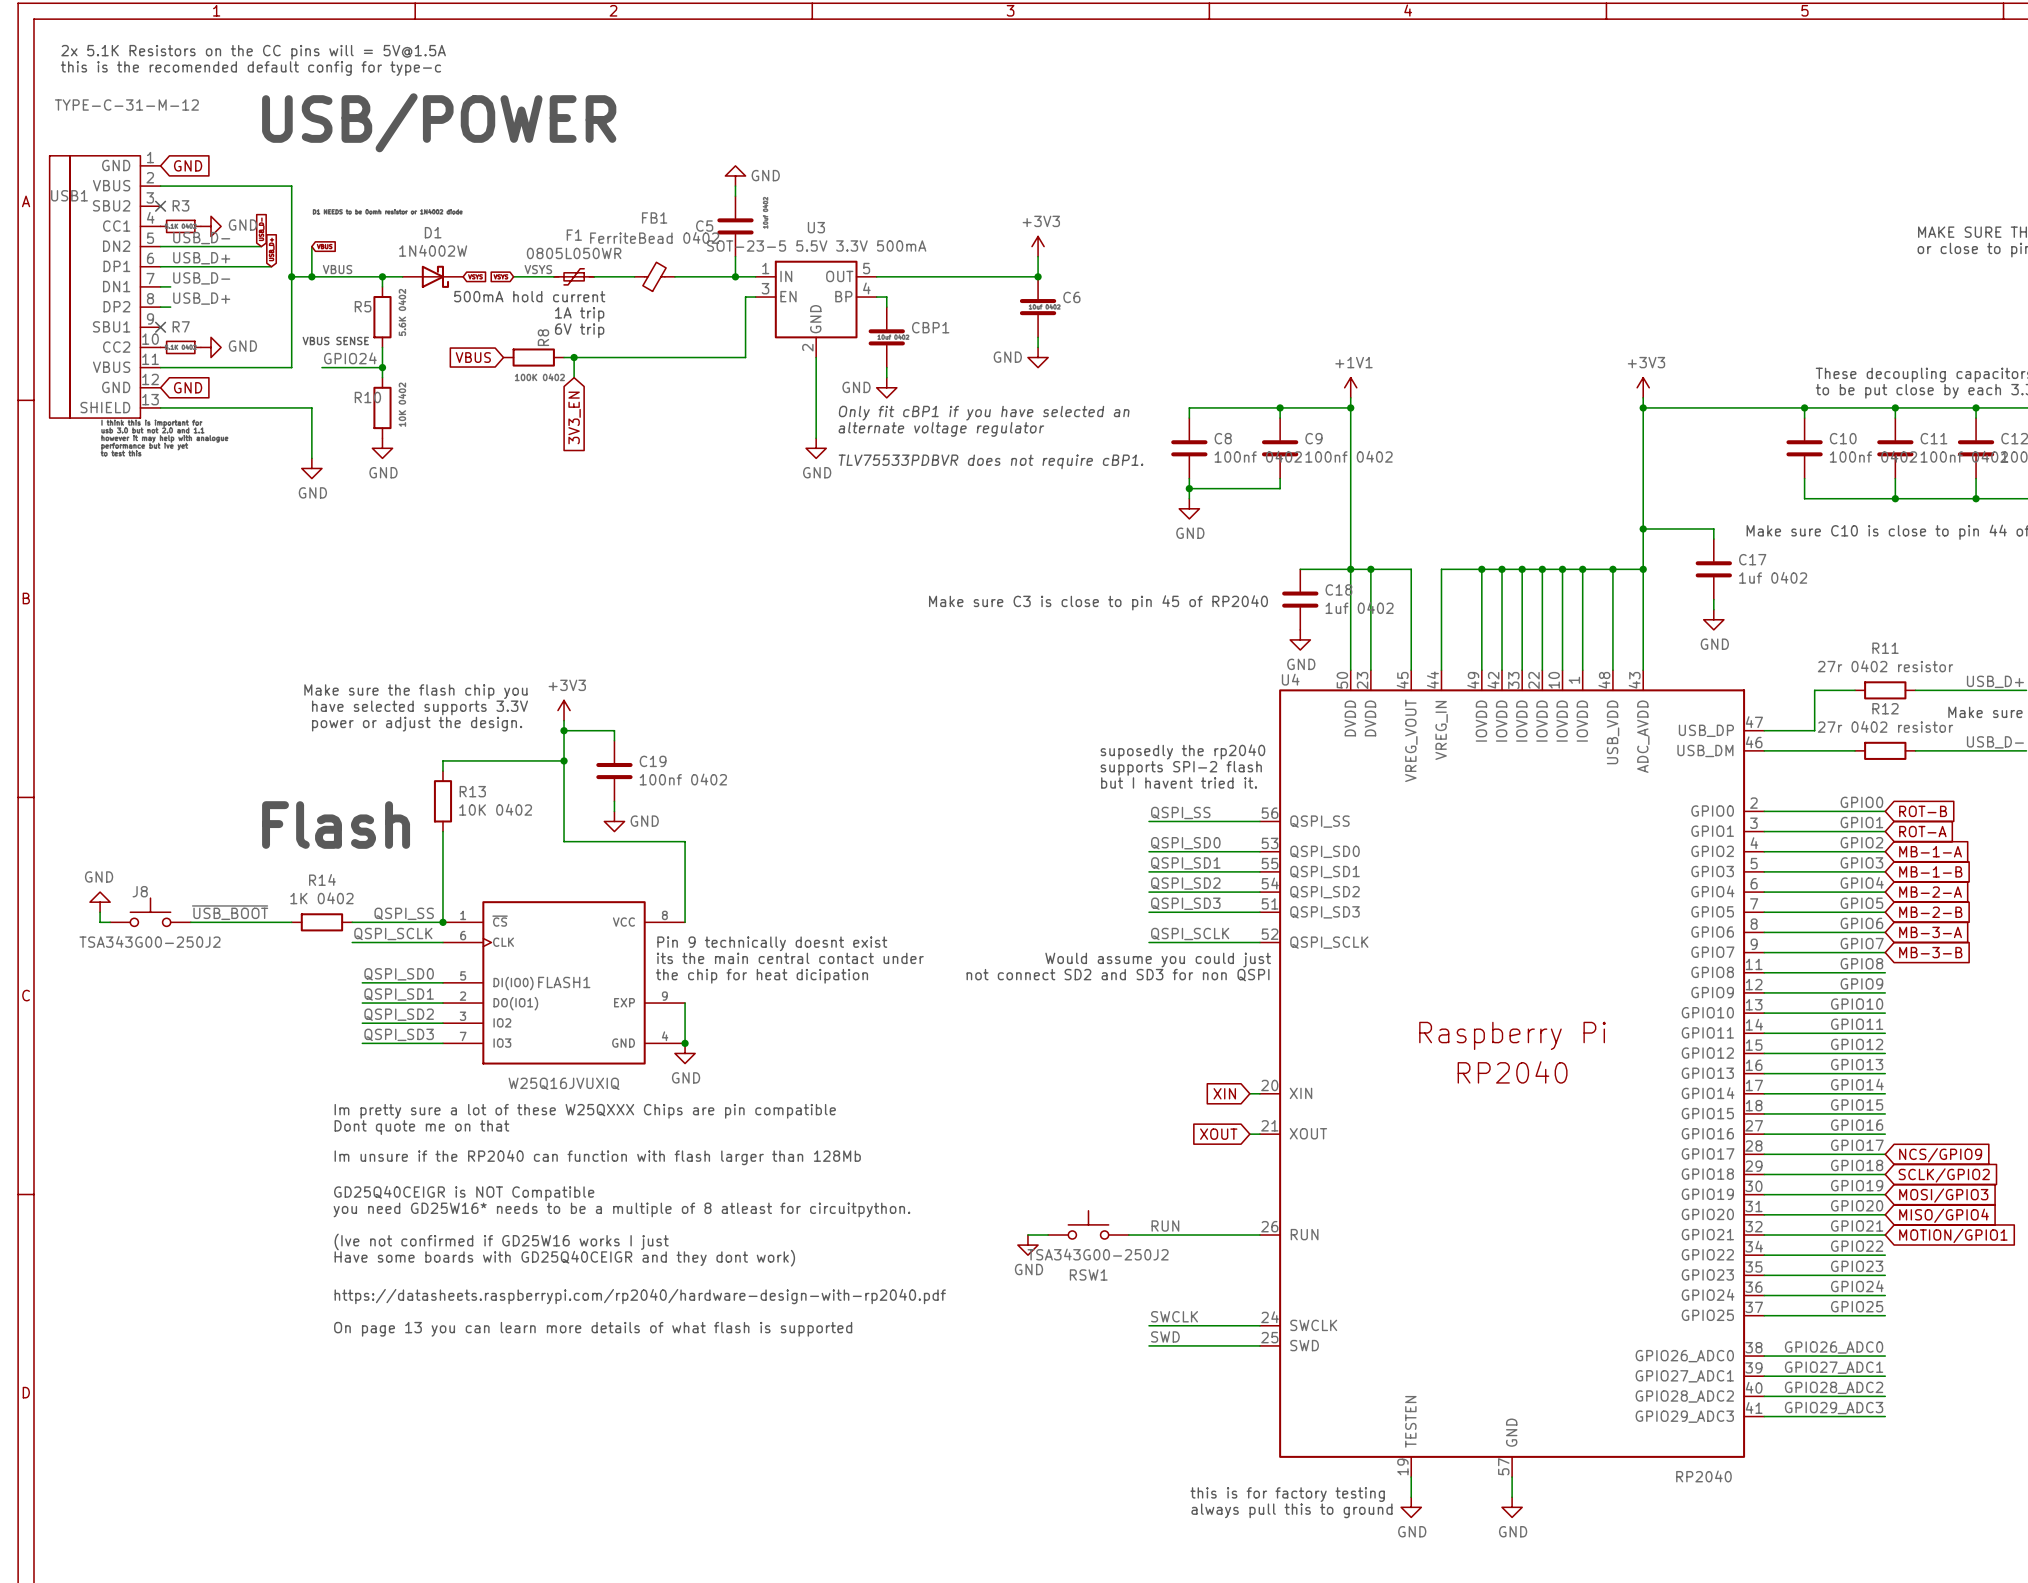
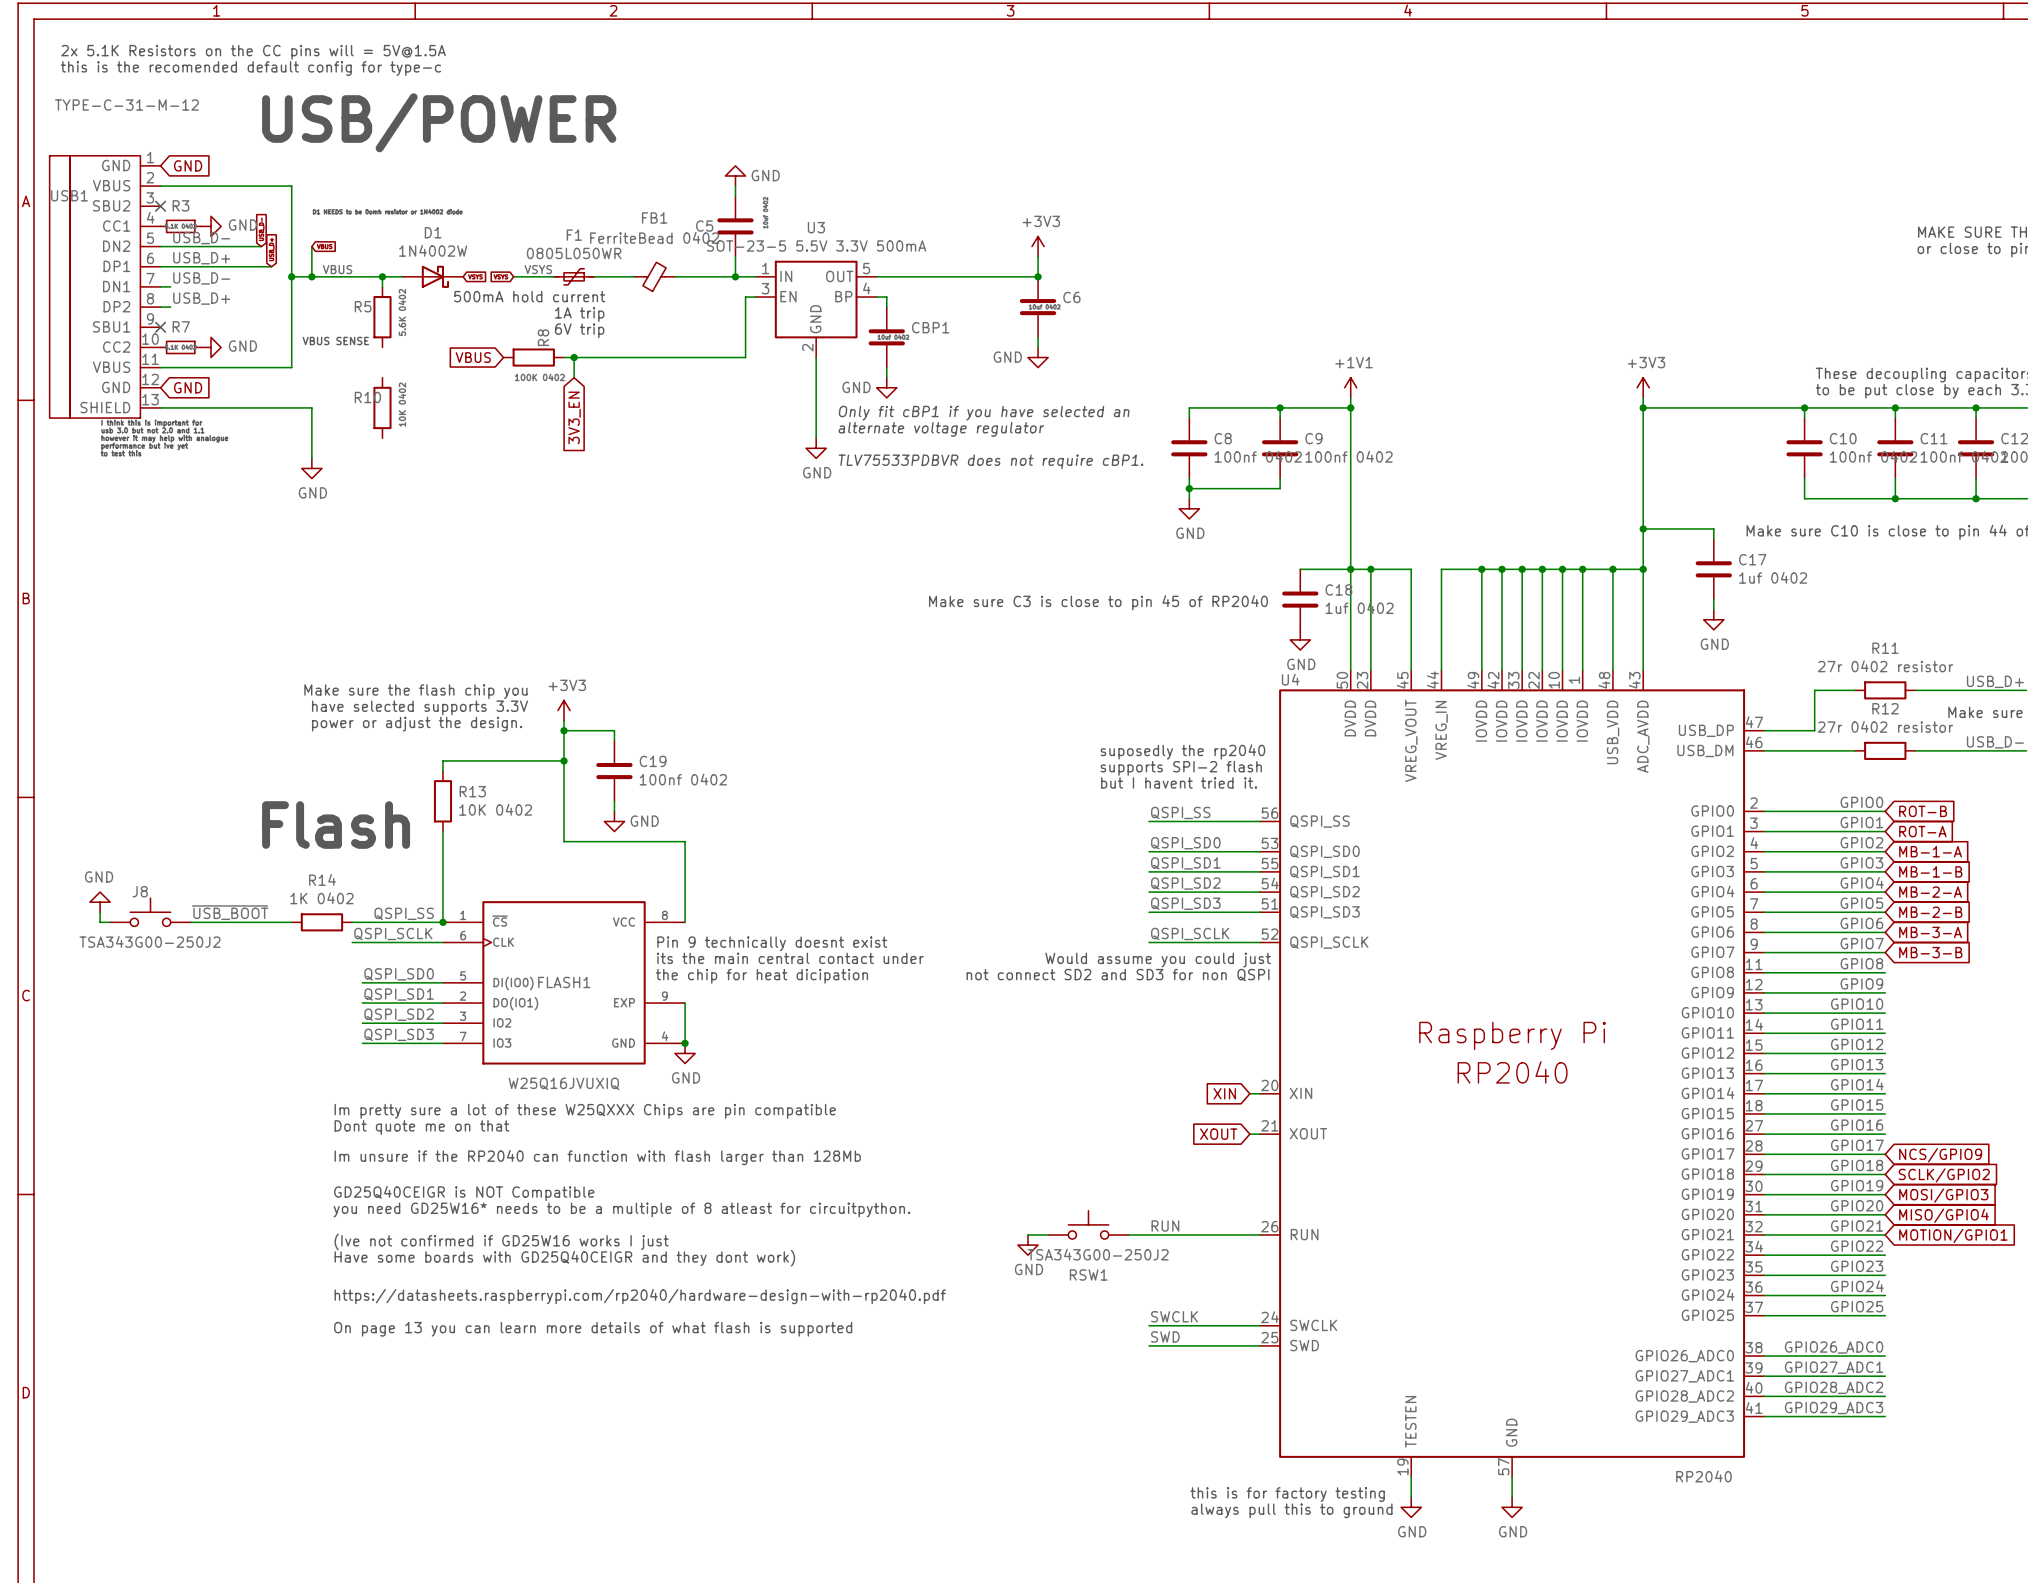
wire: (382, 347) (382, 377) -> none
label: GPIO24 (350, 358) -> none
wire: (321, 367) (382, 367) -> none
junction: (382, 367) -> none
power symbol: GND (382, 448) -> none

